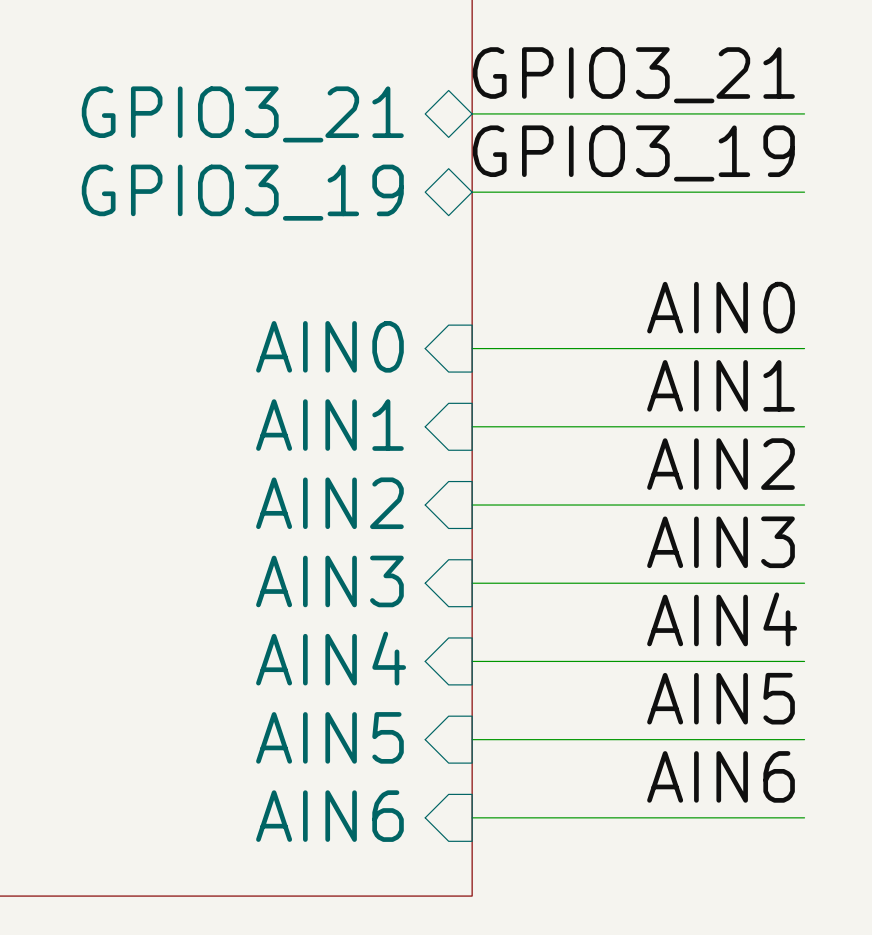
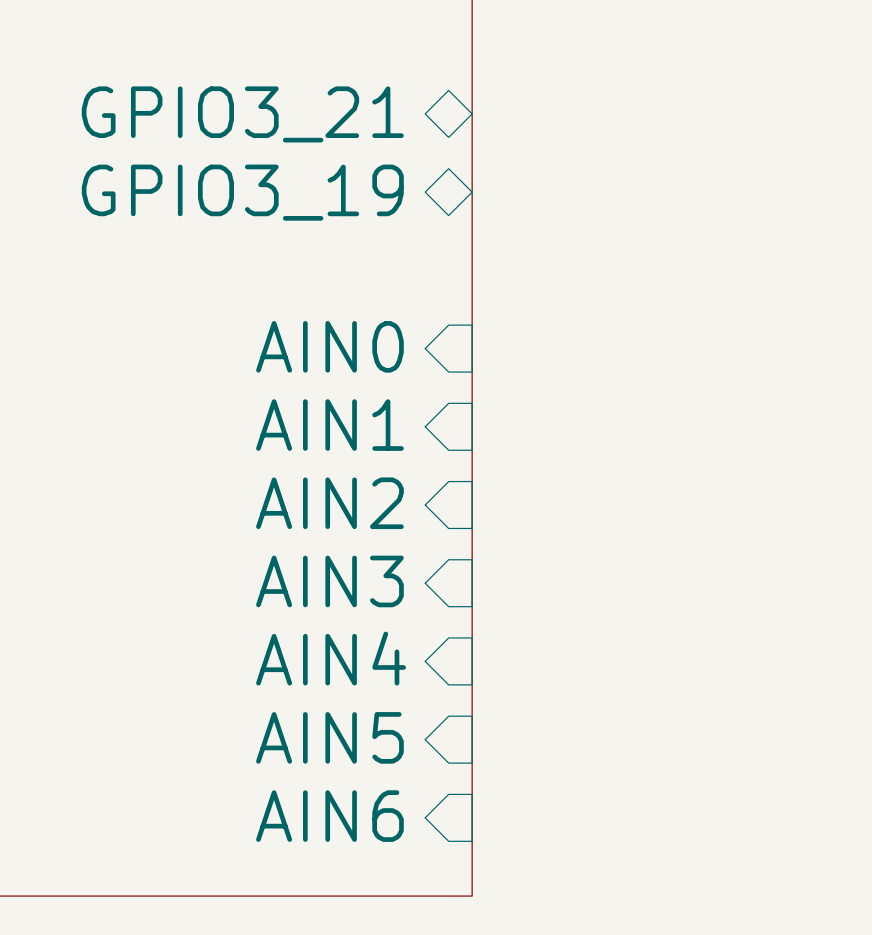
label: GPIO3_21 (633, 75) -> none
wire: (472, 113) (804, 113) -> none
label: GPIO3_19 (633, 153) -> none
wire: (472, 192) (804, 192) -> none
label: AIN0 (721, 307) -> none
wire: (472, 348) (804, 348) -> none
label: AIN1 (721, 385) -> none
wire: (472, 426) (804, 426) -> none
label: AIN2 (721, 464) -> none
wire: (472, 505) (804, 505) -> none
label: AIN3 (721, 542) -> none
wire: (472, 583) (804, 583) -> none
label: AIN4 (722, 619) -> none
wire: (472, 661) (804, 661) -> none
label: AIN5 (721, 698) -> none
wire: (472, 739) (804, 739) -> none
label: AIN6 (721, 776) -> none
wire: (472, 817) (804, 817) -> none

